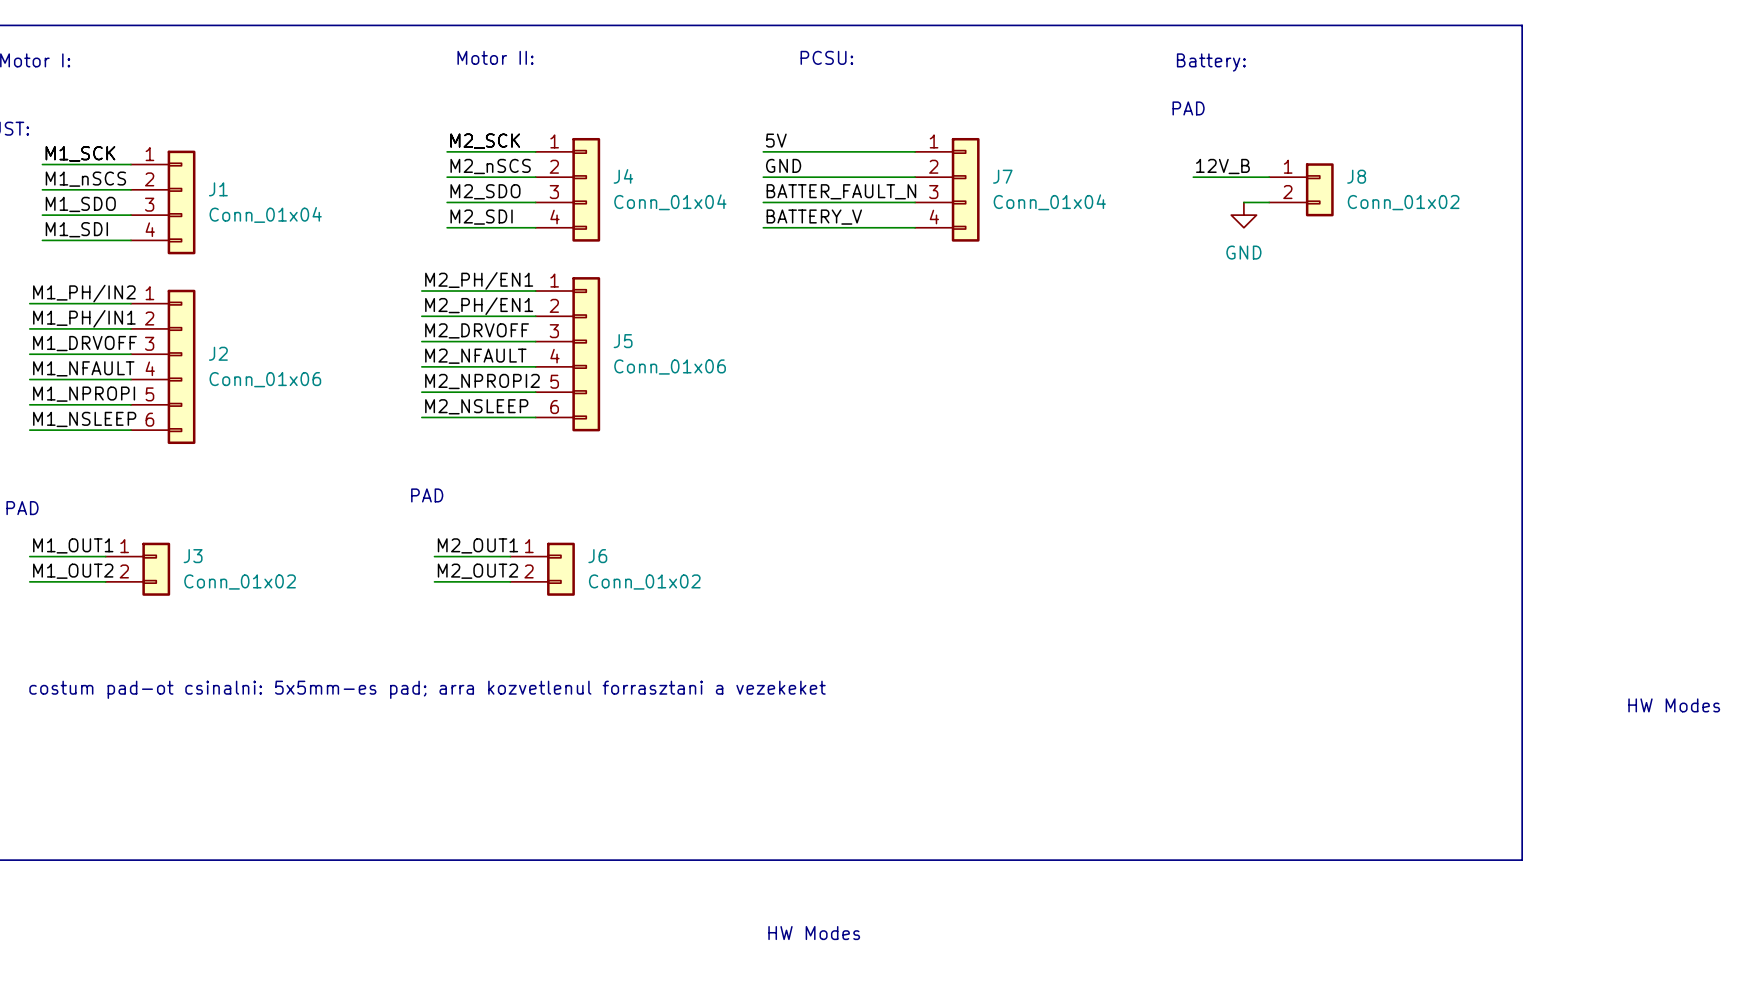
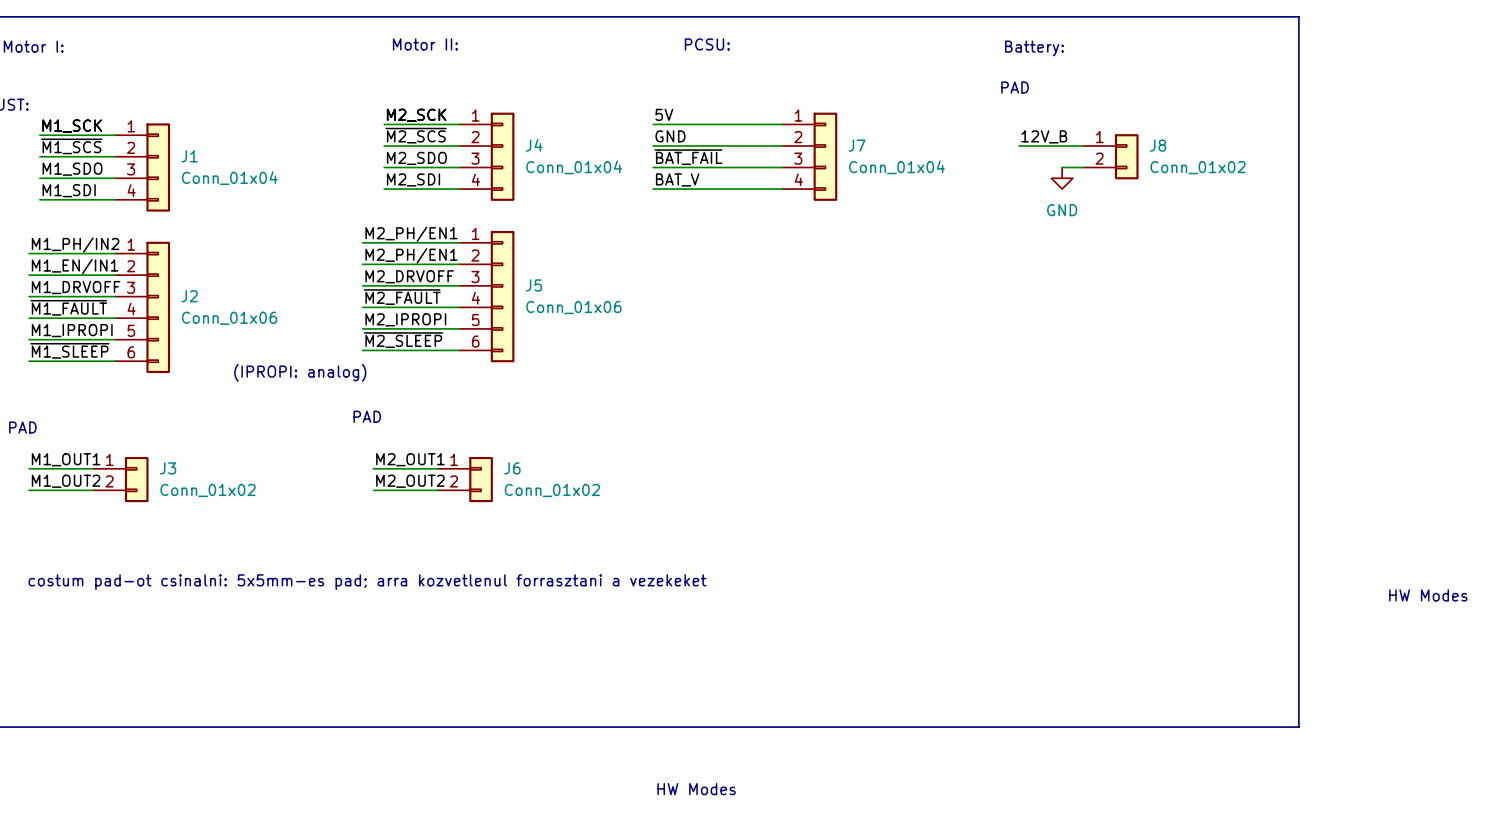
label: M2_nSCS (490, 166) -> ~{M2_SCS} (416, 135)
label: M1_nSCS (85, 179) -> ~{M1_SCS} (71, 146)
label: BATTER_FAULT_N (841, 191) -> ~{BAT_FAIL} (688, 157)
label: BATTERY_V (814, 217) -> BAT_V (677, 179)
label: M1_PH/IN1 (84, 318) -> M1_EN/IN1 (75, 266)
label: M2_NFAULT (475, 356) -> ~{M2_FAULT} (402, 297)
label: M1_NFAULT (83, 368) -> ~{M1_FAULT} (68, 307)
label: M2_NPROPI2 (482, 381) -> M2_IPROPI (405, 319)
label: M1_NPROPI (84, 394) -> M1_IPROPI (72, 330)
label: M2_NSLEEP (476, 406) -> ~{M2_SLEEP} (403, 340)
label: M1_NSLEEP (84, 419) -> ~{M1_SLEEP} (69, 350)
text: none -> (IPROPI: analog) (300, 372)

